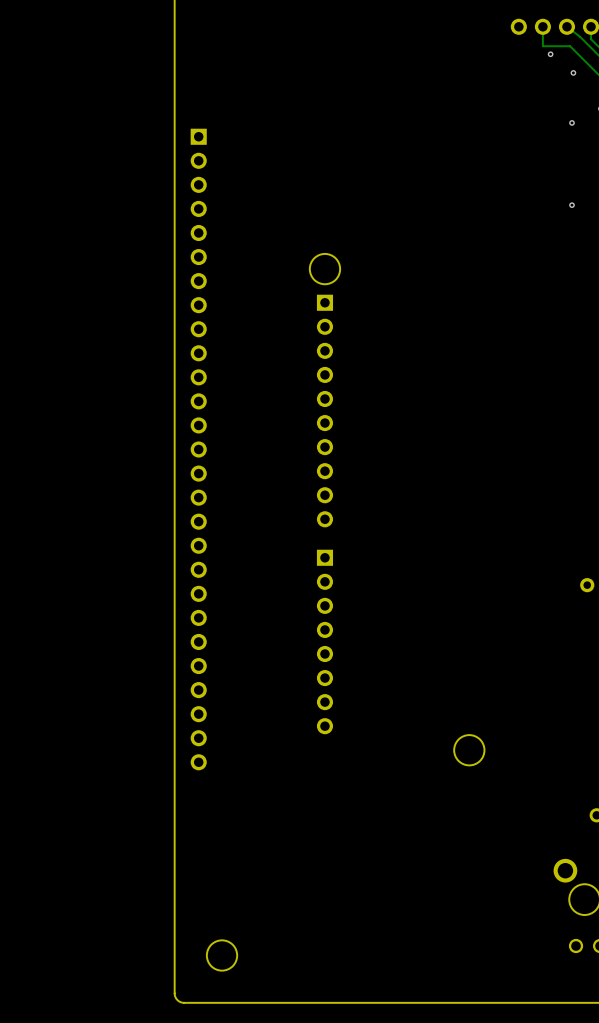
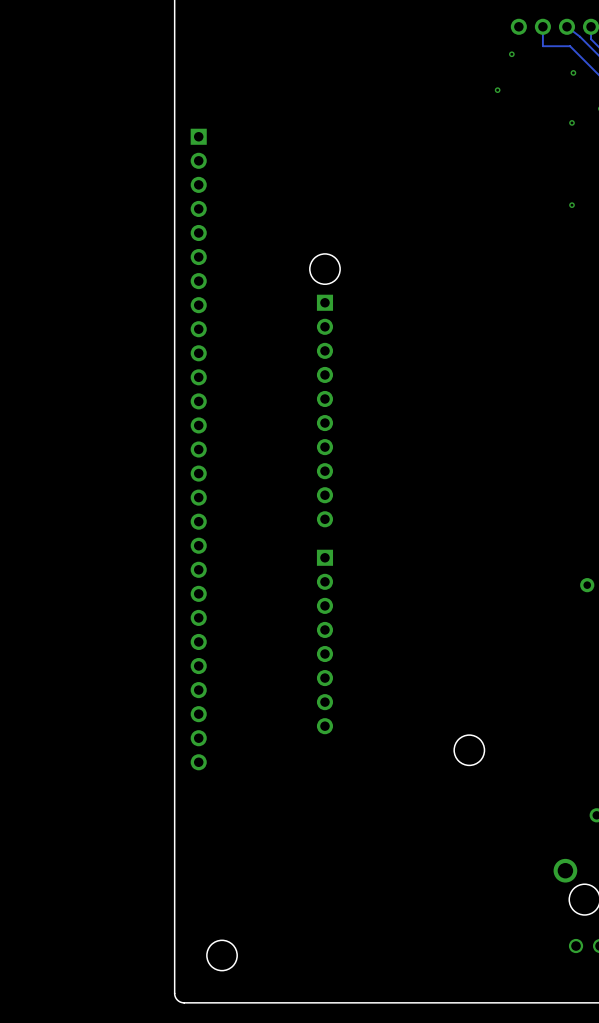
via: none -> (511, 54)
via: (550, 54) -> none
via: none -> (497, 90)

